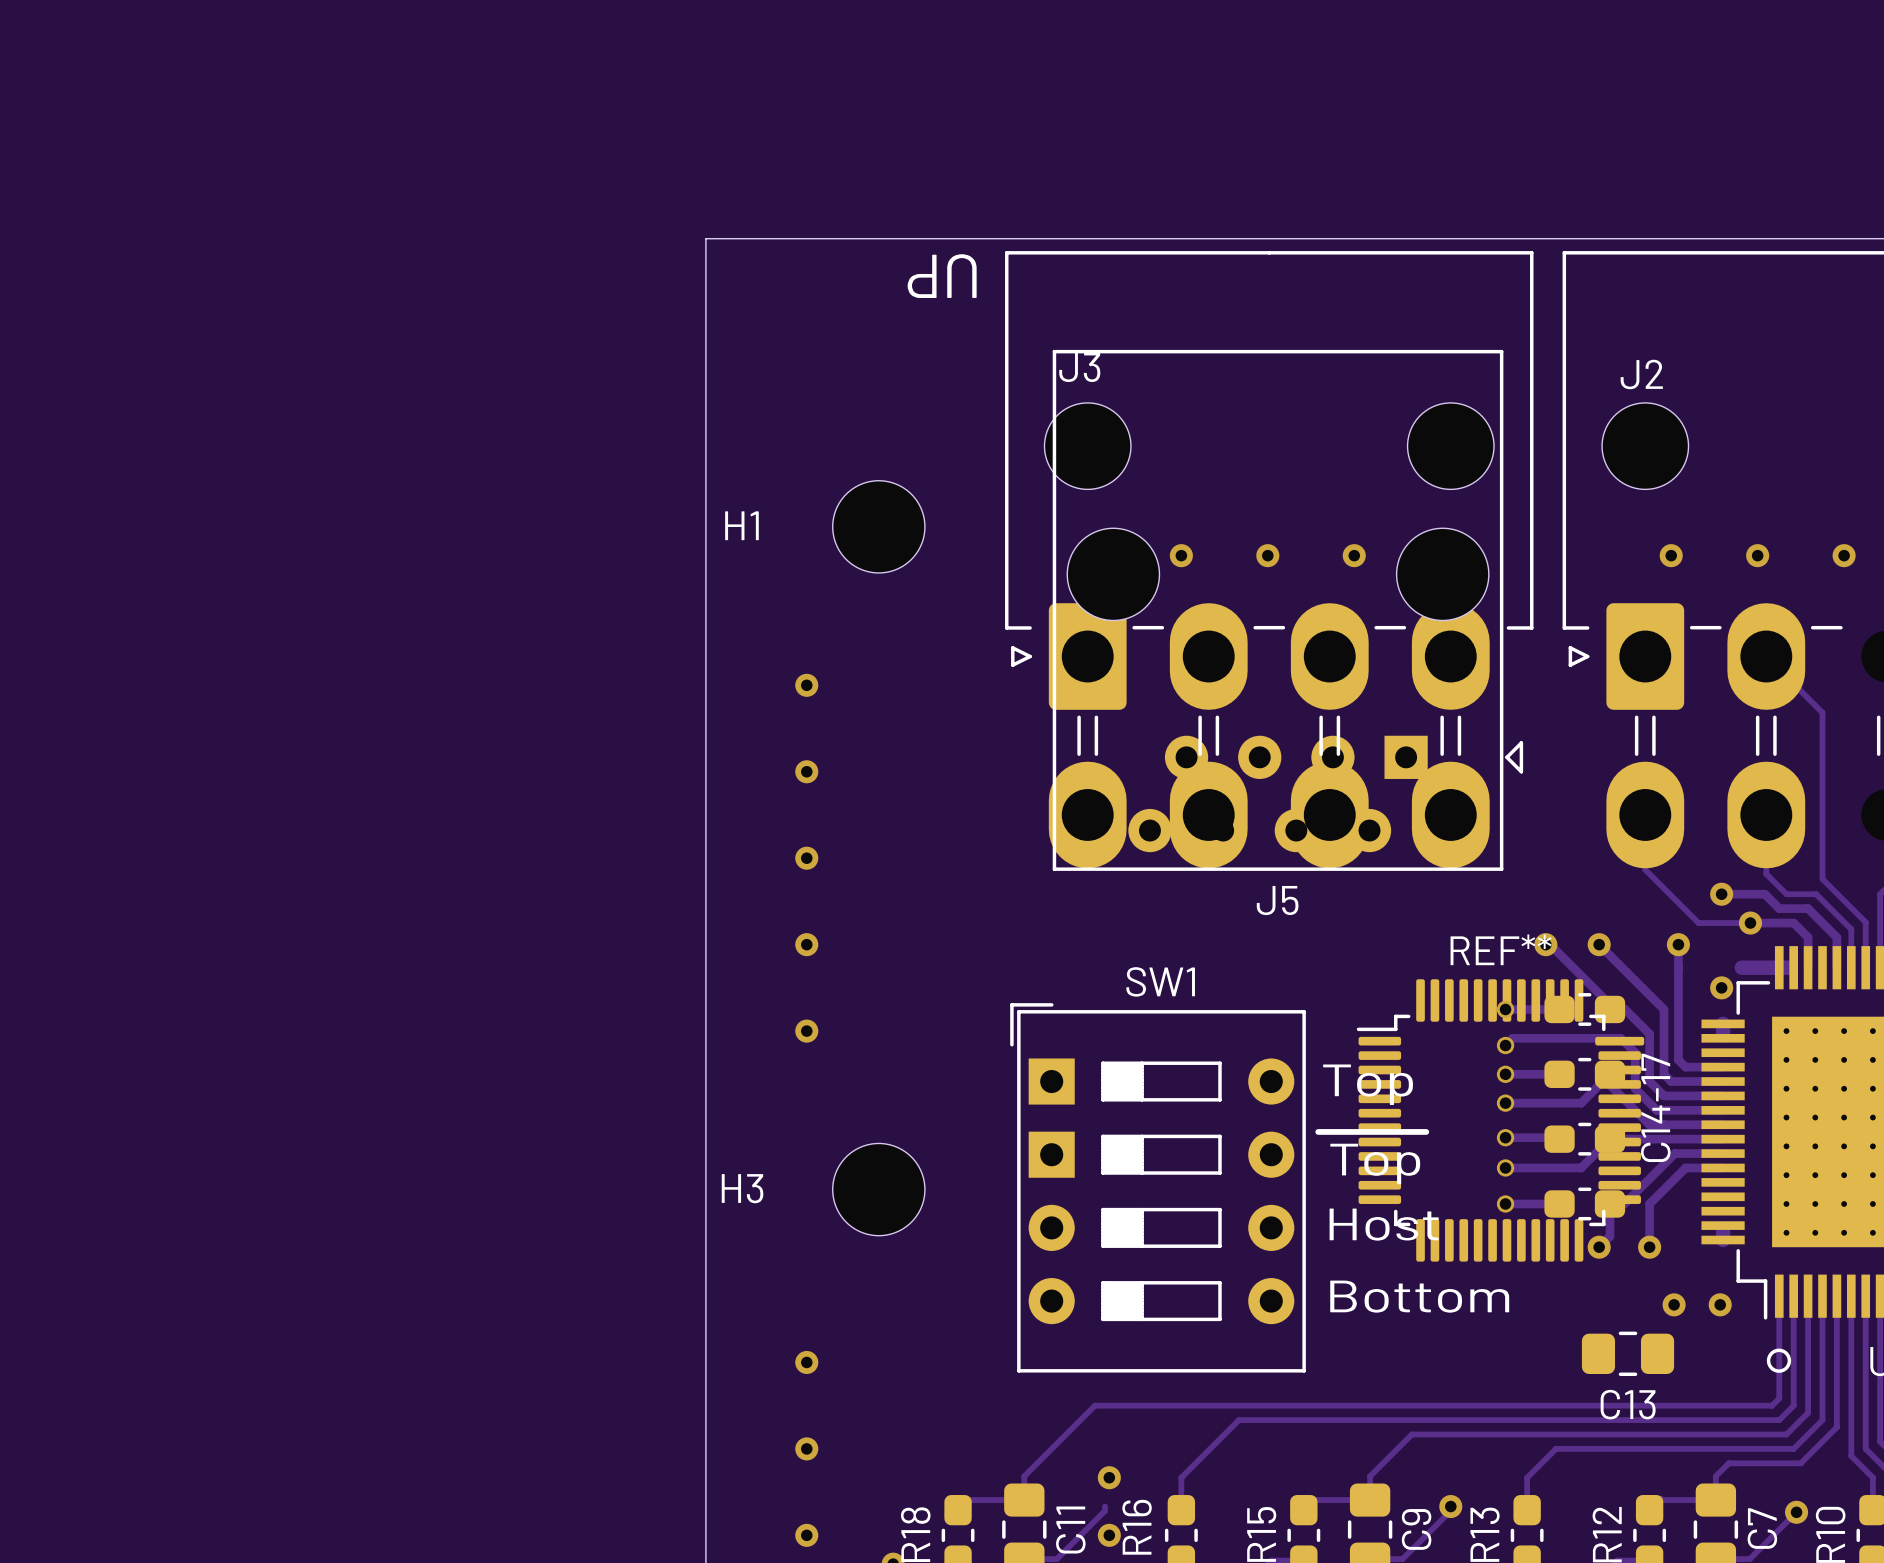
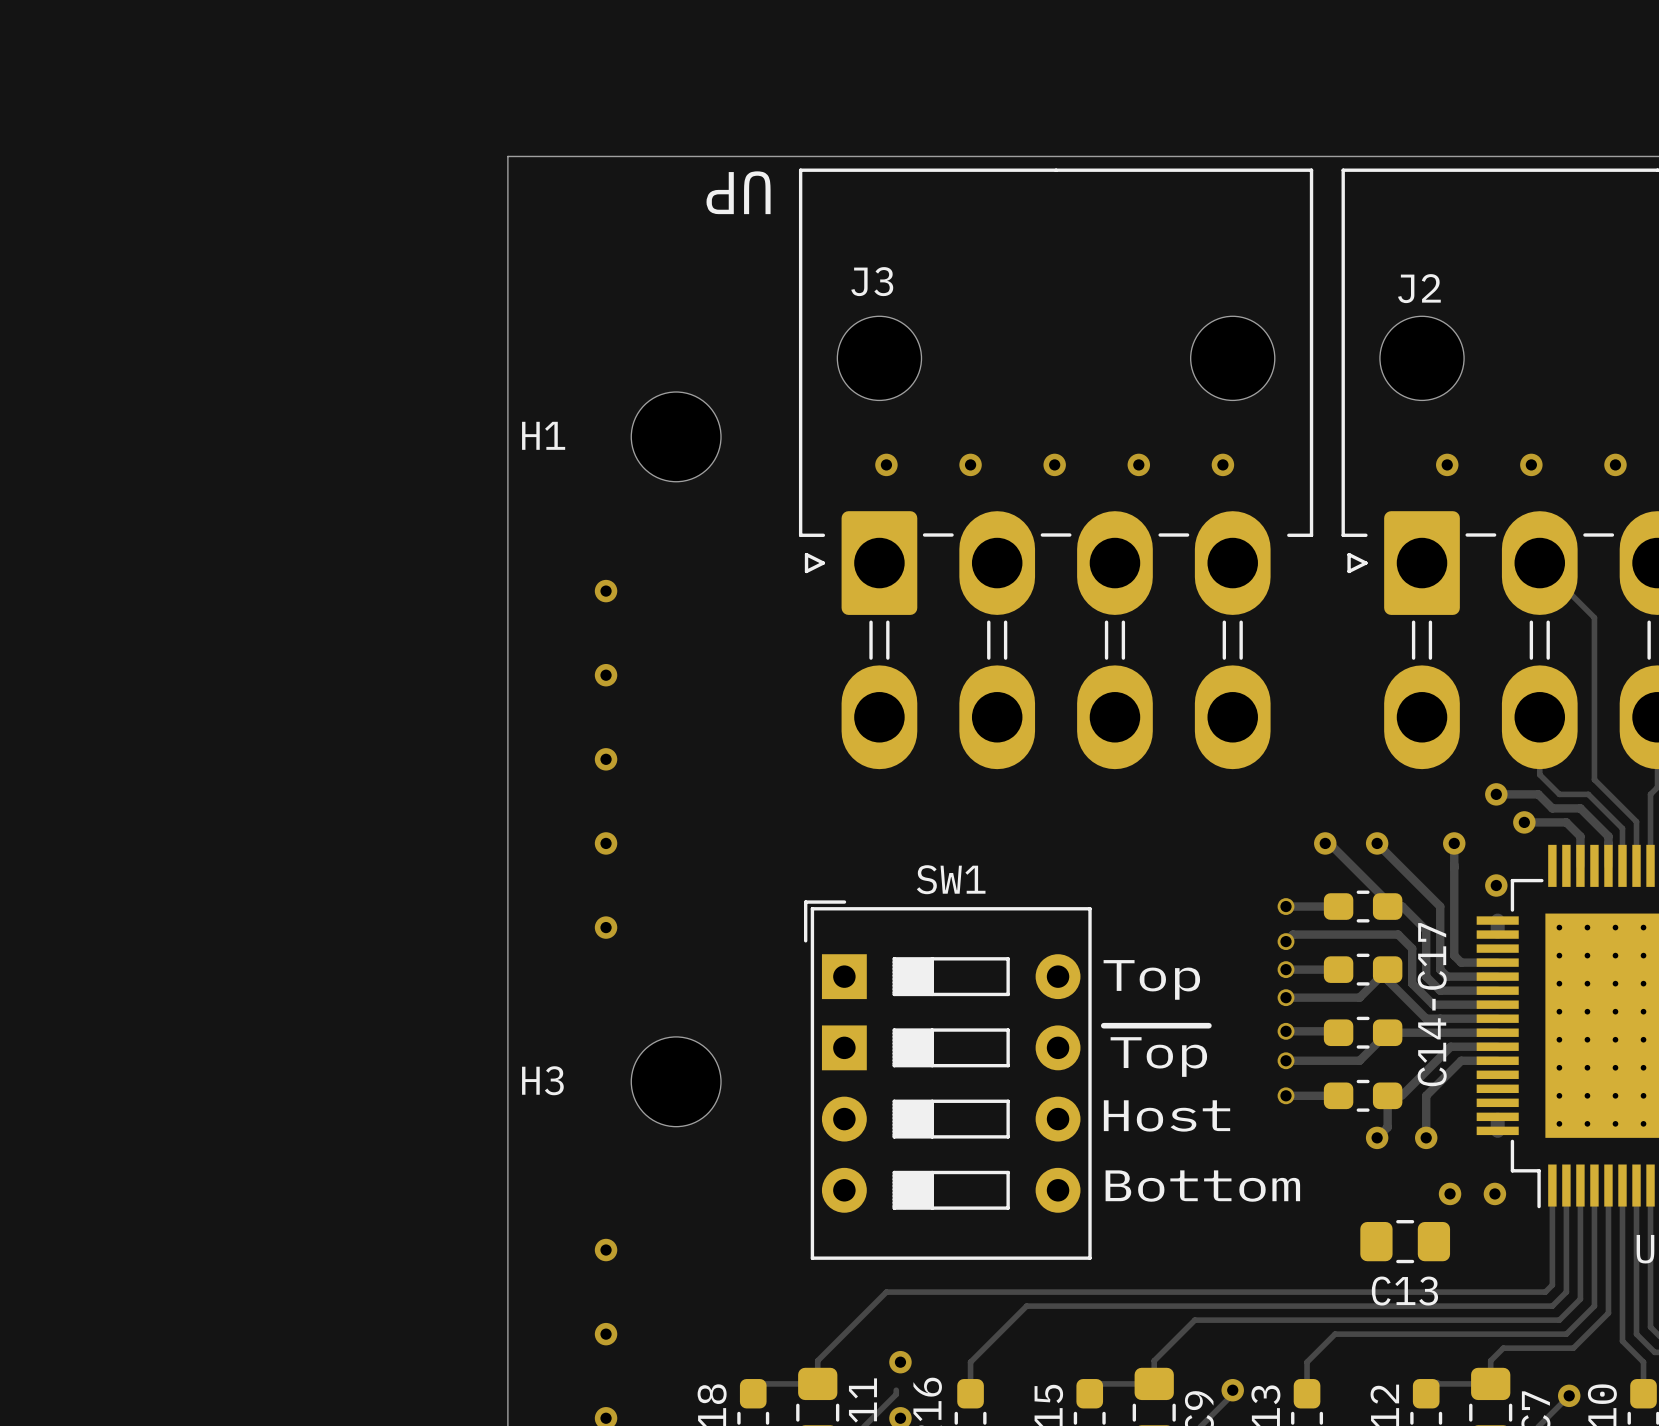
J5: (1287, 610) -> none
track: (1645, 814) (1645, 869) (1698, 923) (1750, 923) -> none
track: (1741, 967) (1790, 967) -> none
text: C14-17 (1655, 1107) -> none
C14-C17 name: none -> C14-C17 (1432, 1004)
REF**: (1500, 1120) -> none
drawing: [1766, 1348, 1792, 1373] -> none

